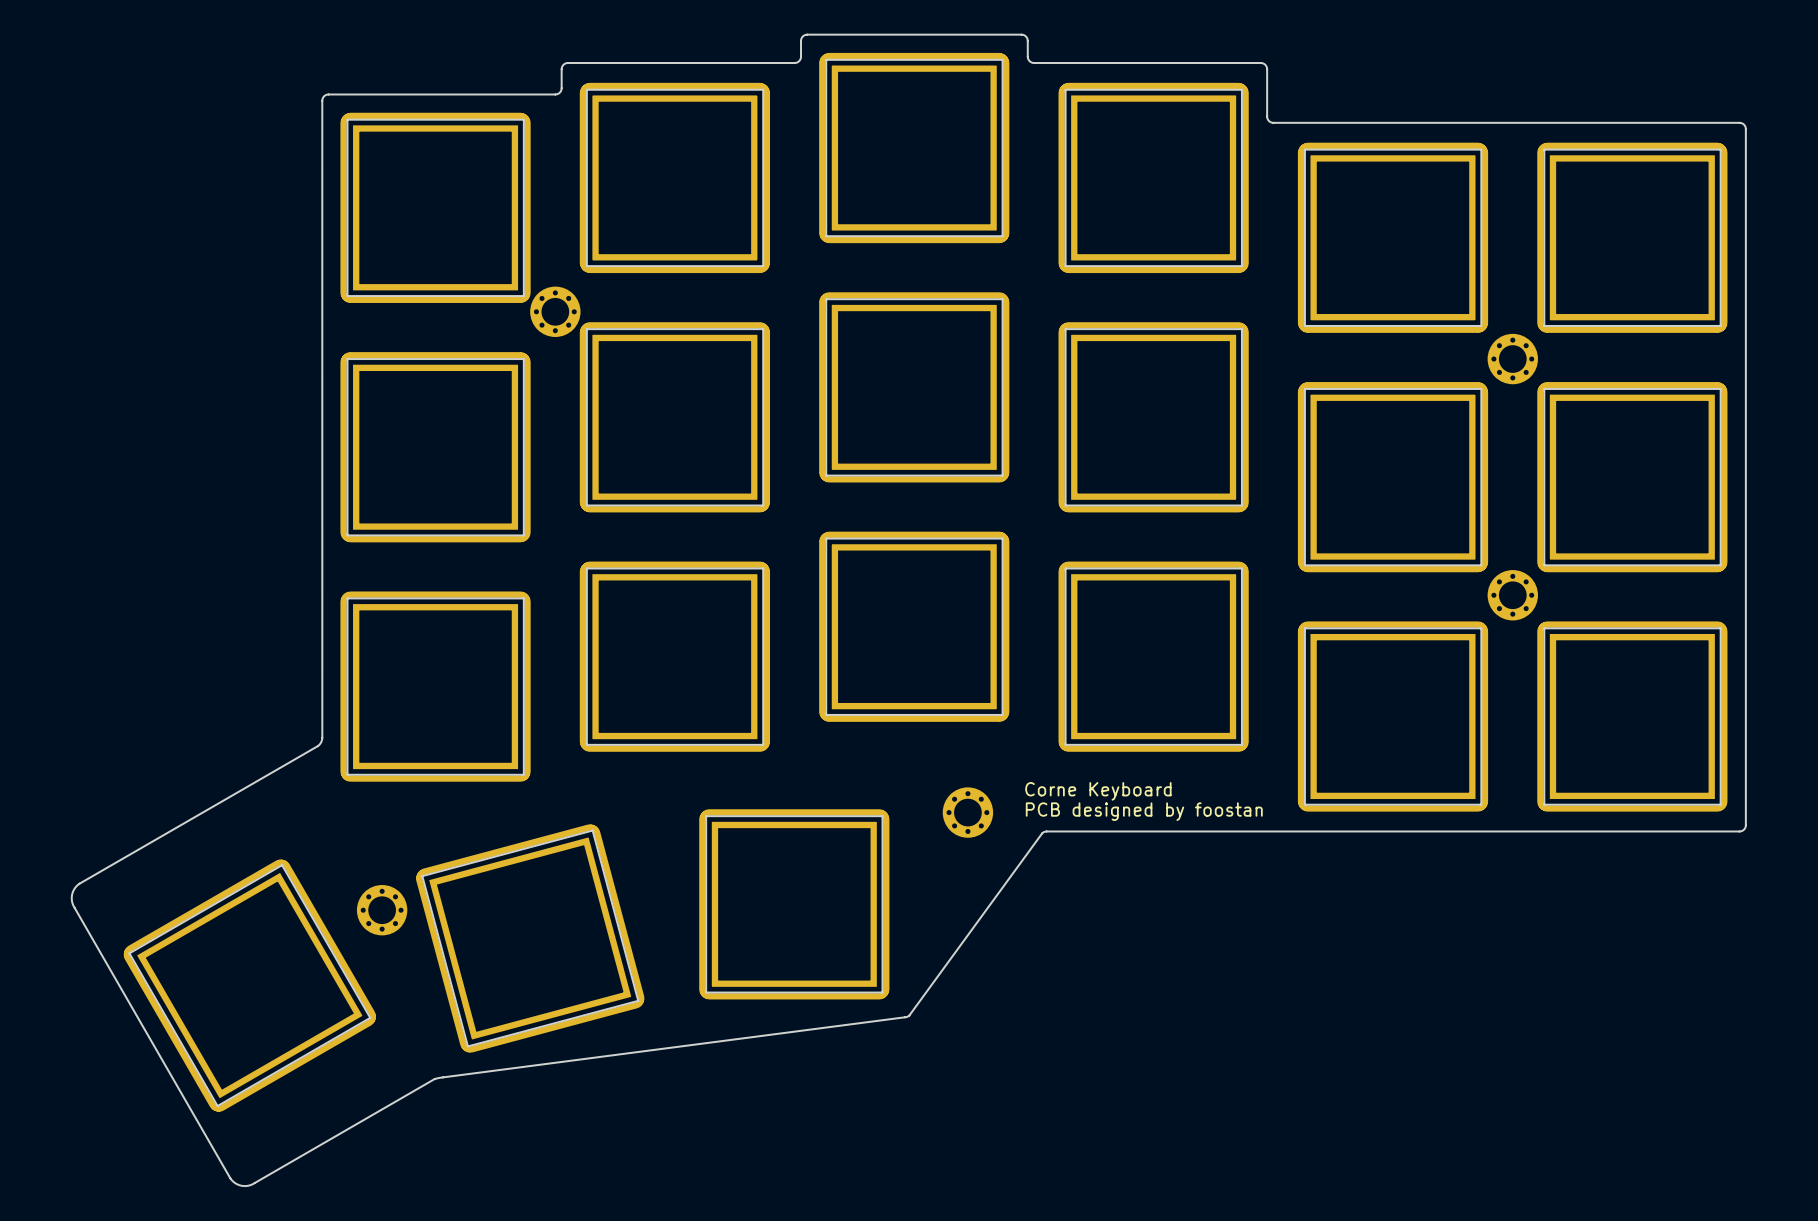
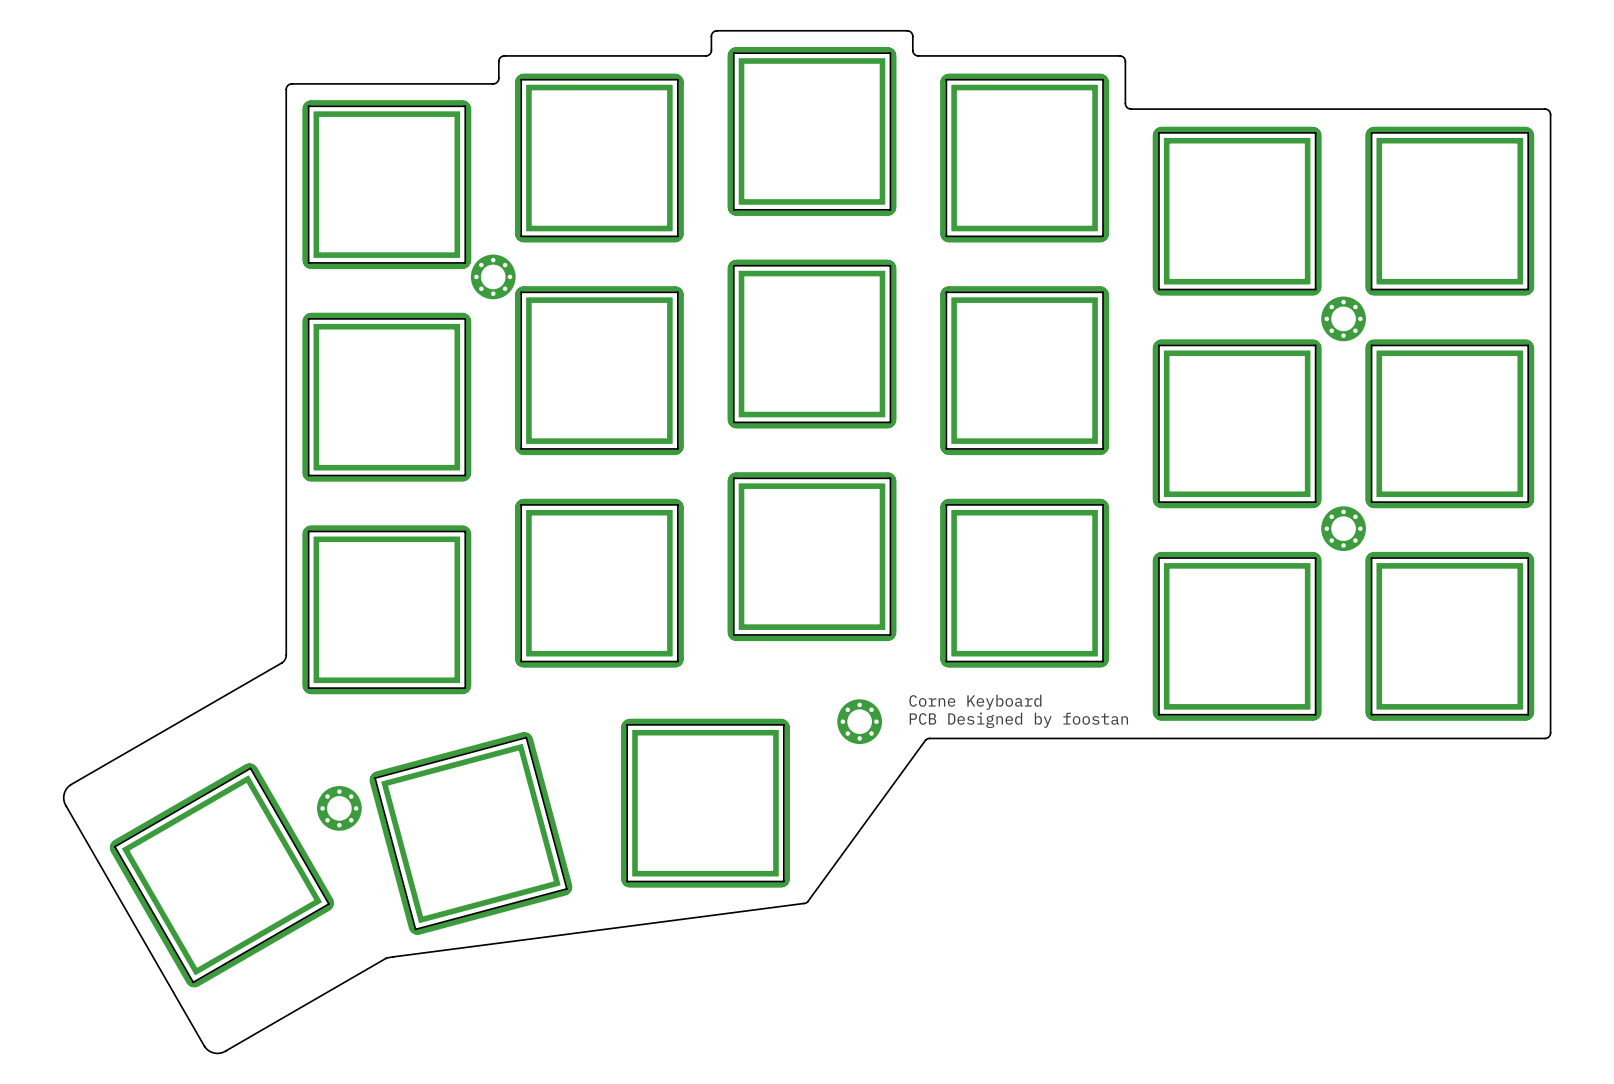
text: PCB designed by foostan (1144, 811) -> PCB Designed by foostan (1018, 720)

